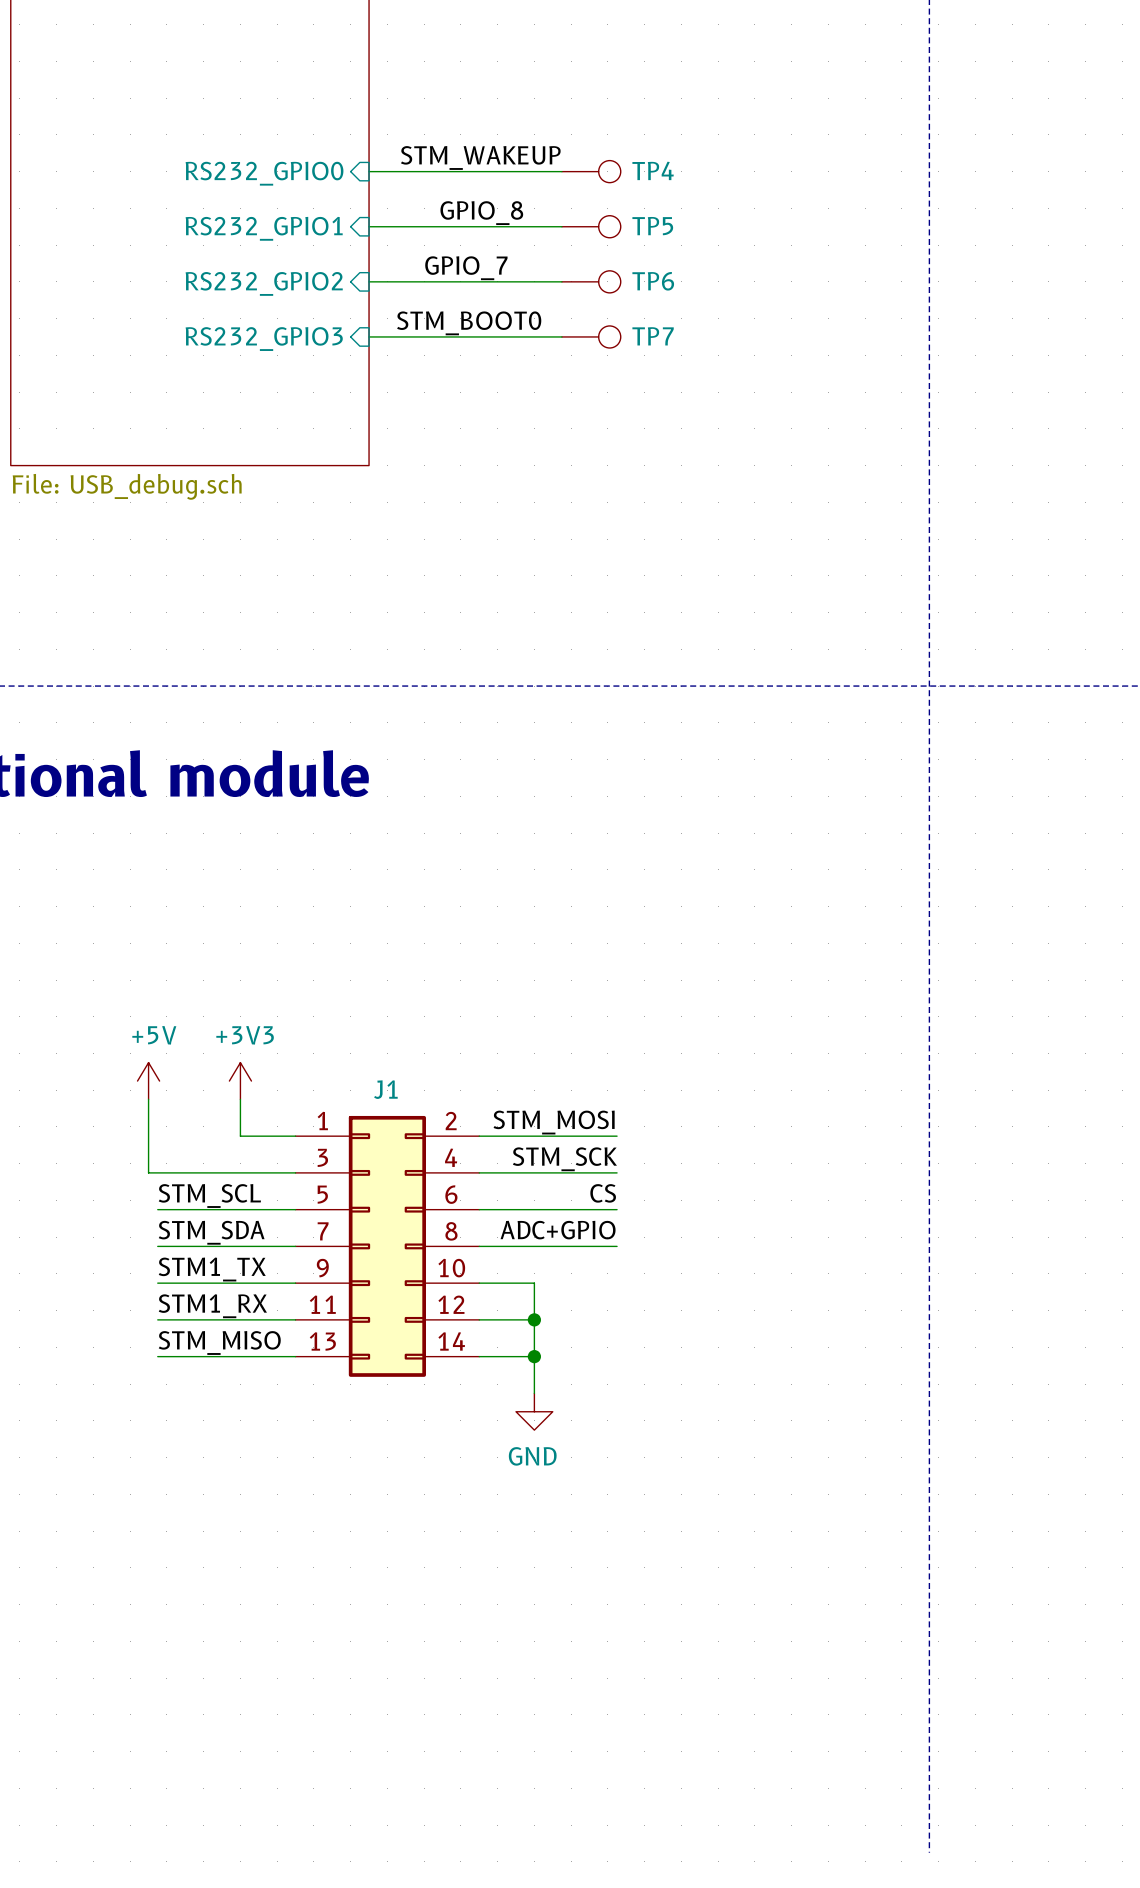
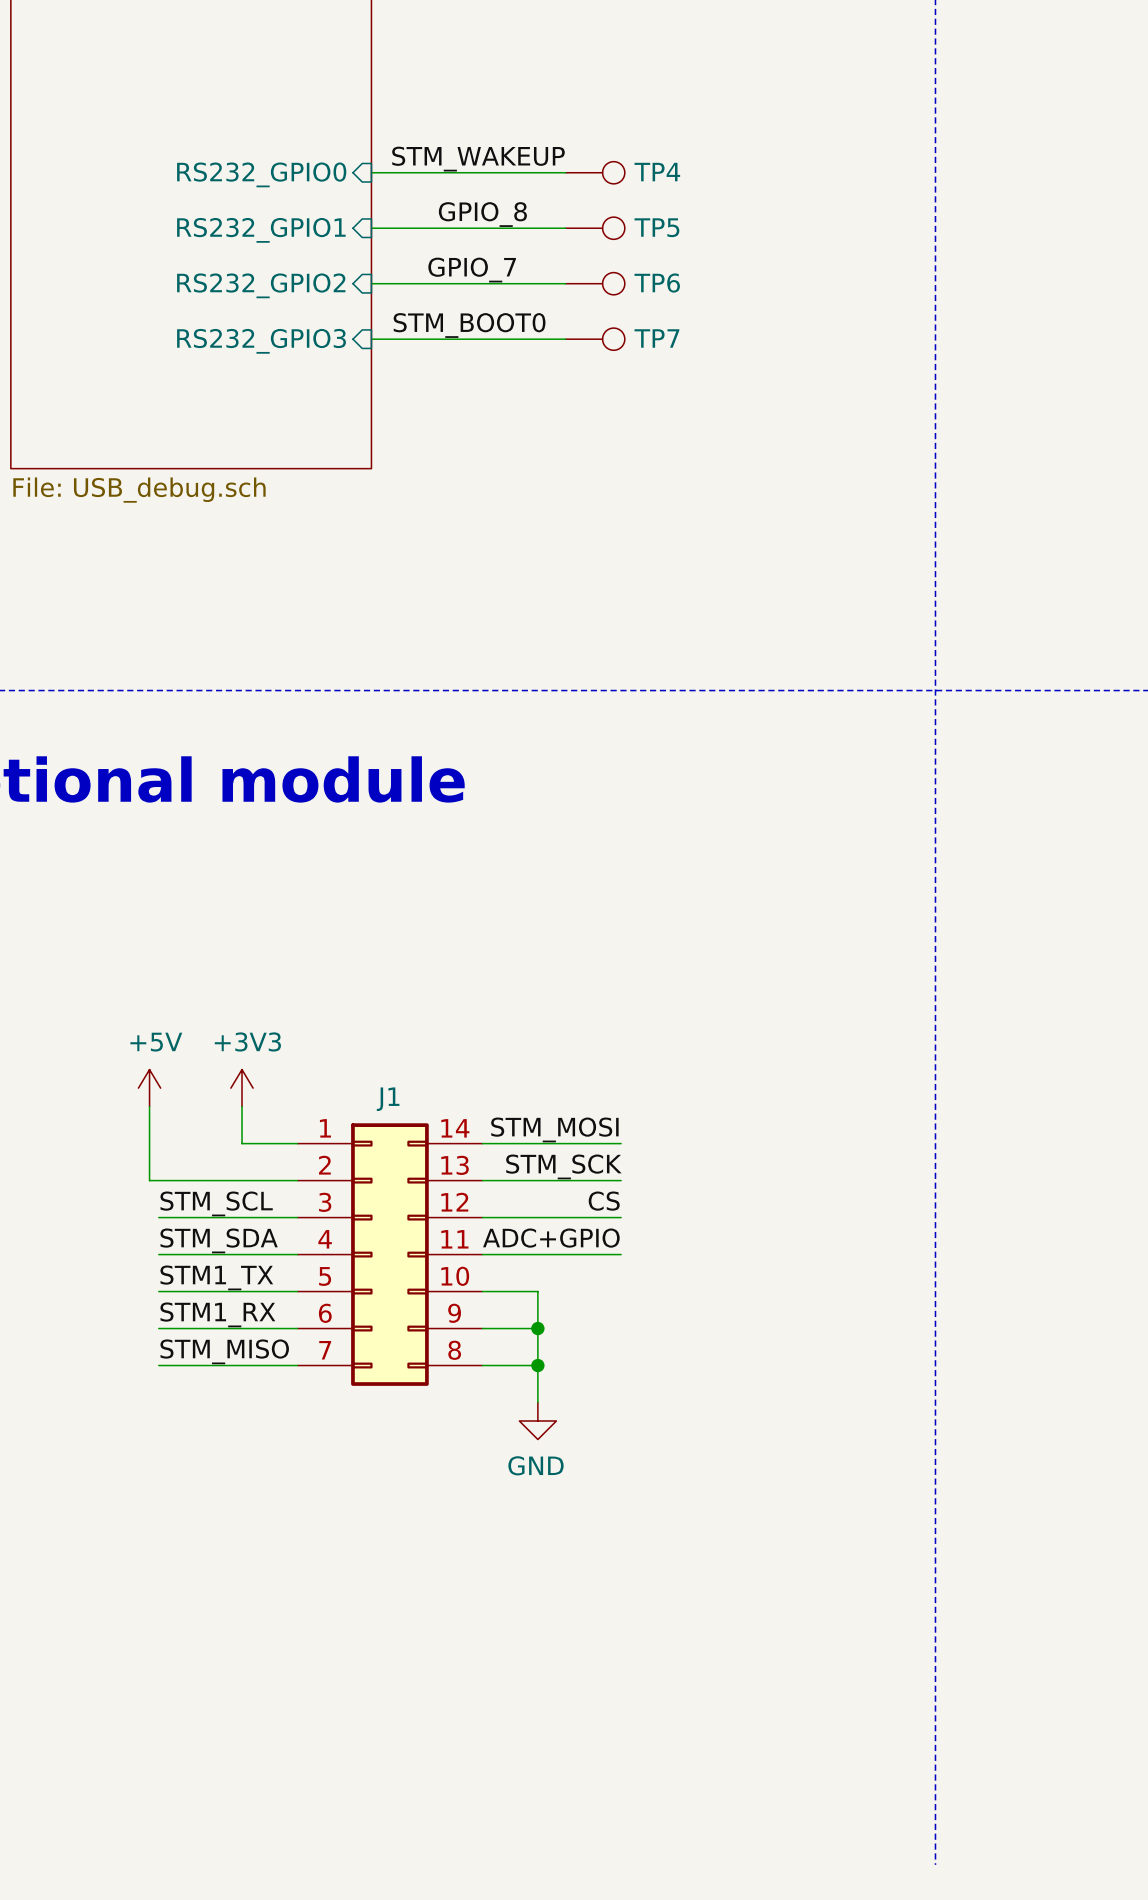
J1 symbol: [295, 1115, 480, 1377] -> [297, 1123, 483, 1386]

